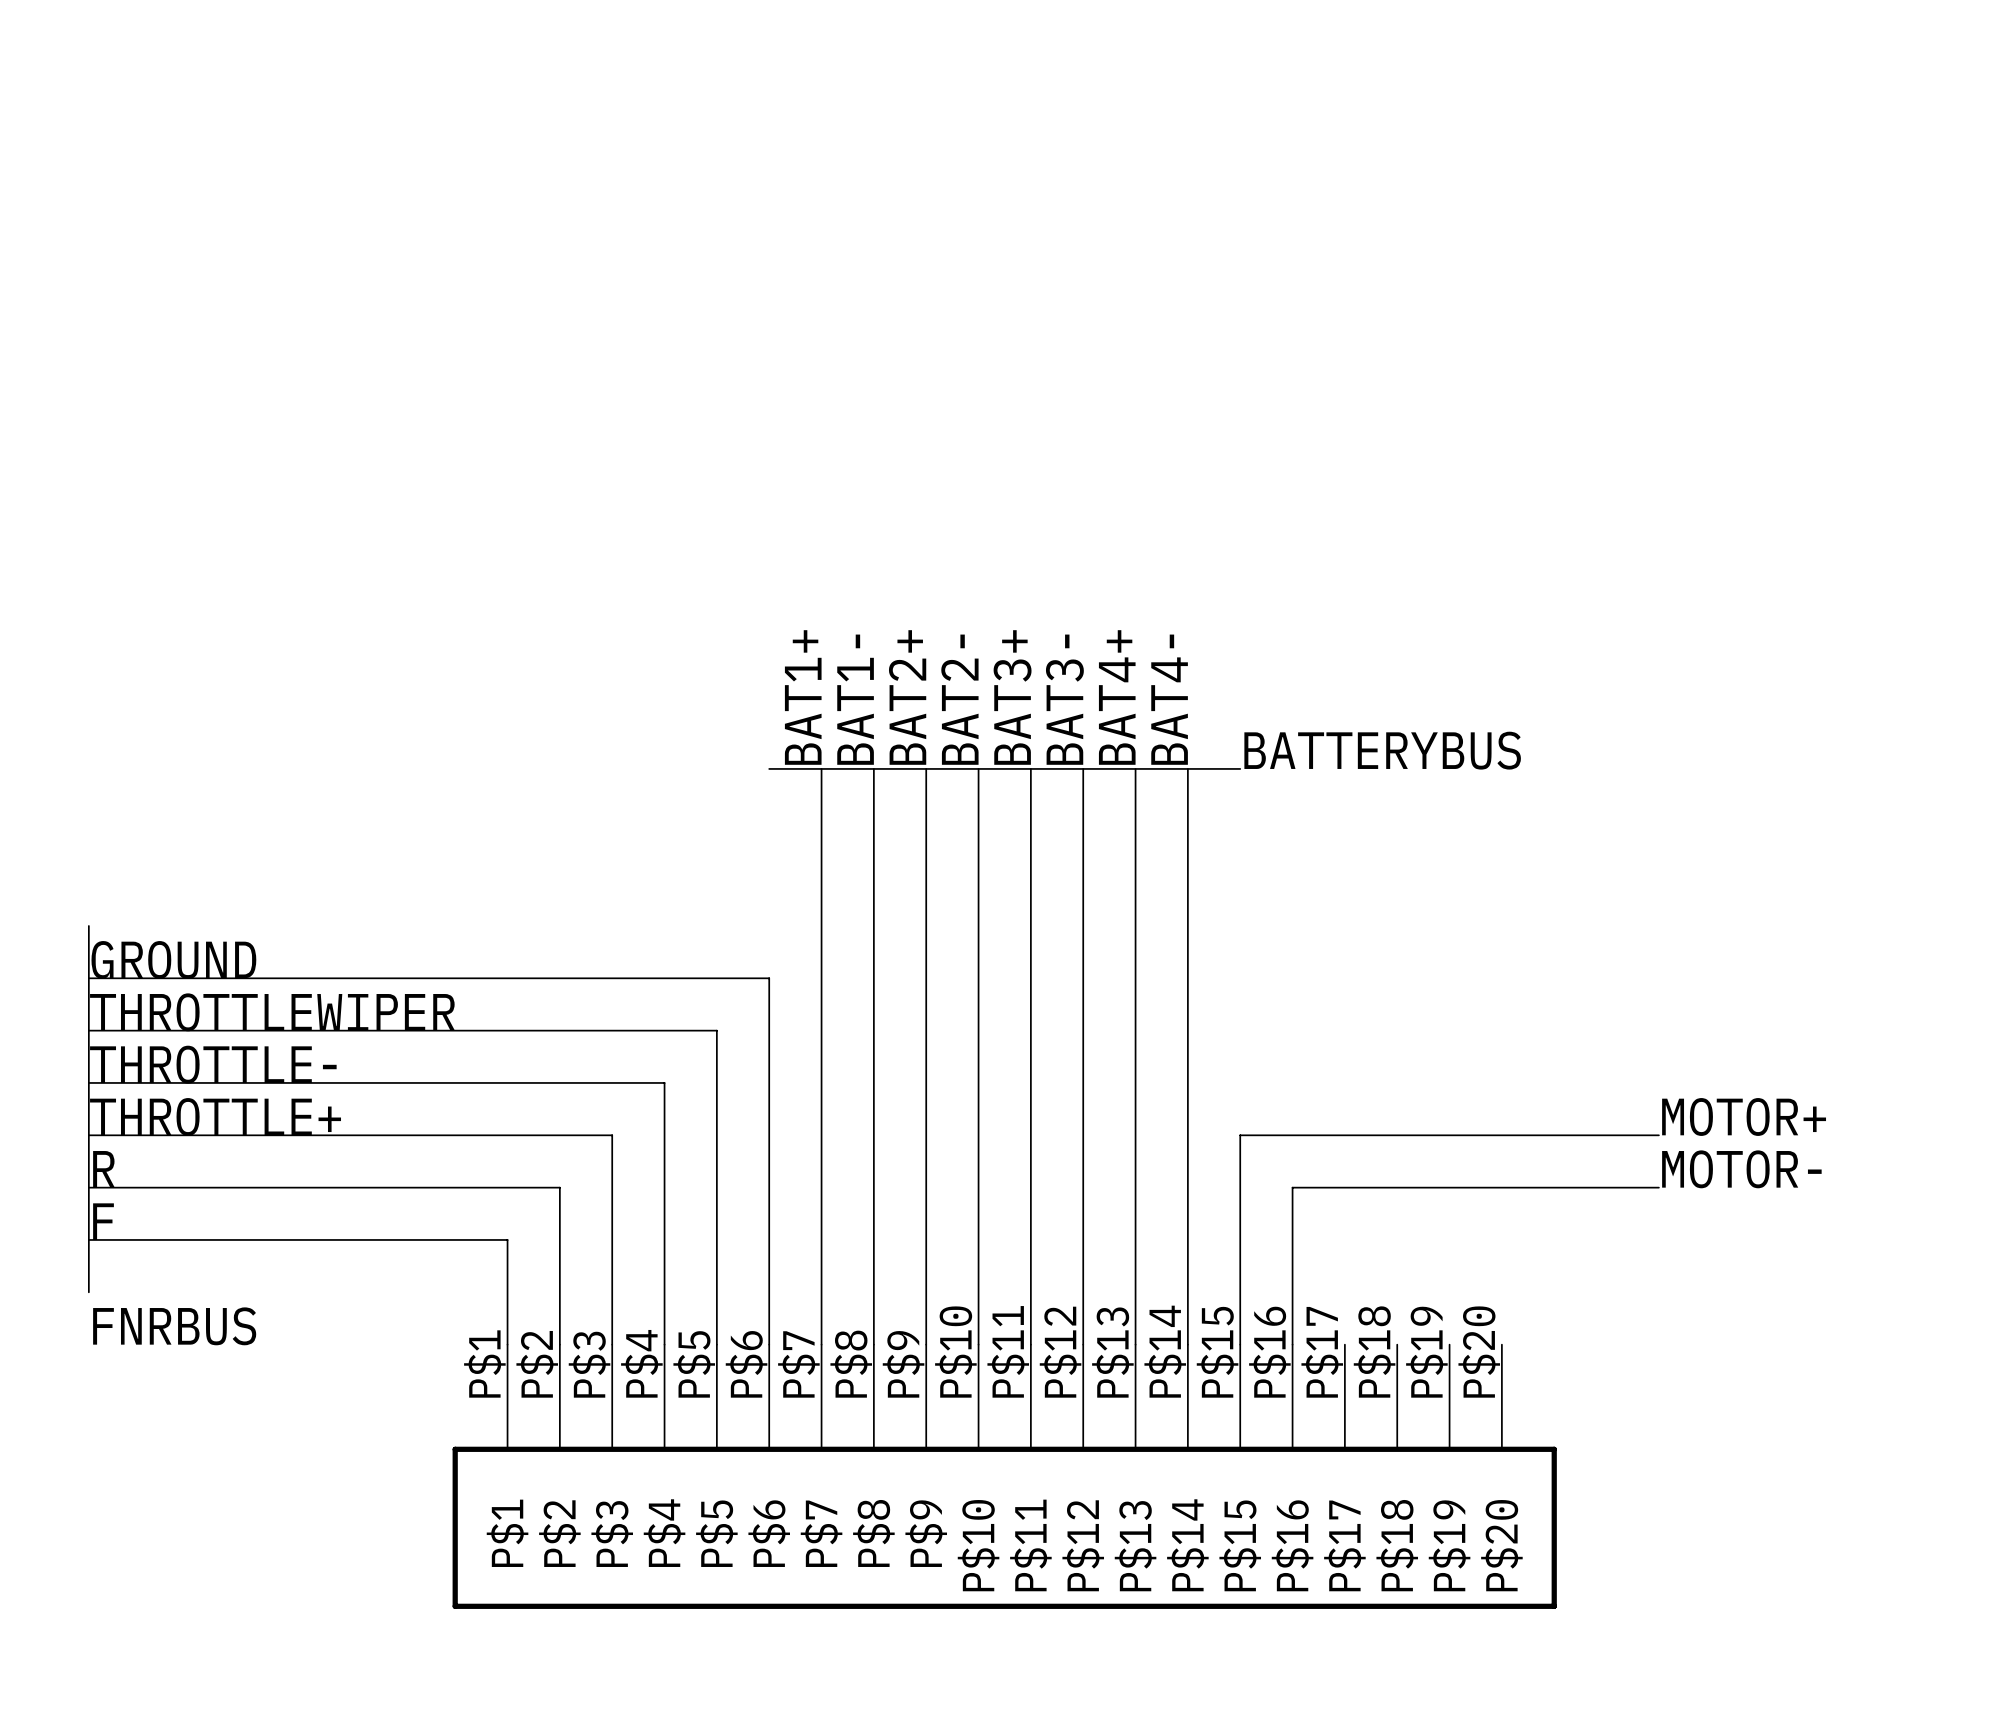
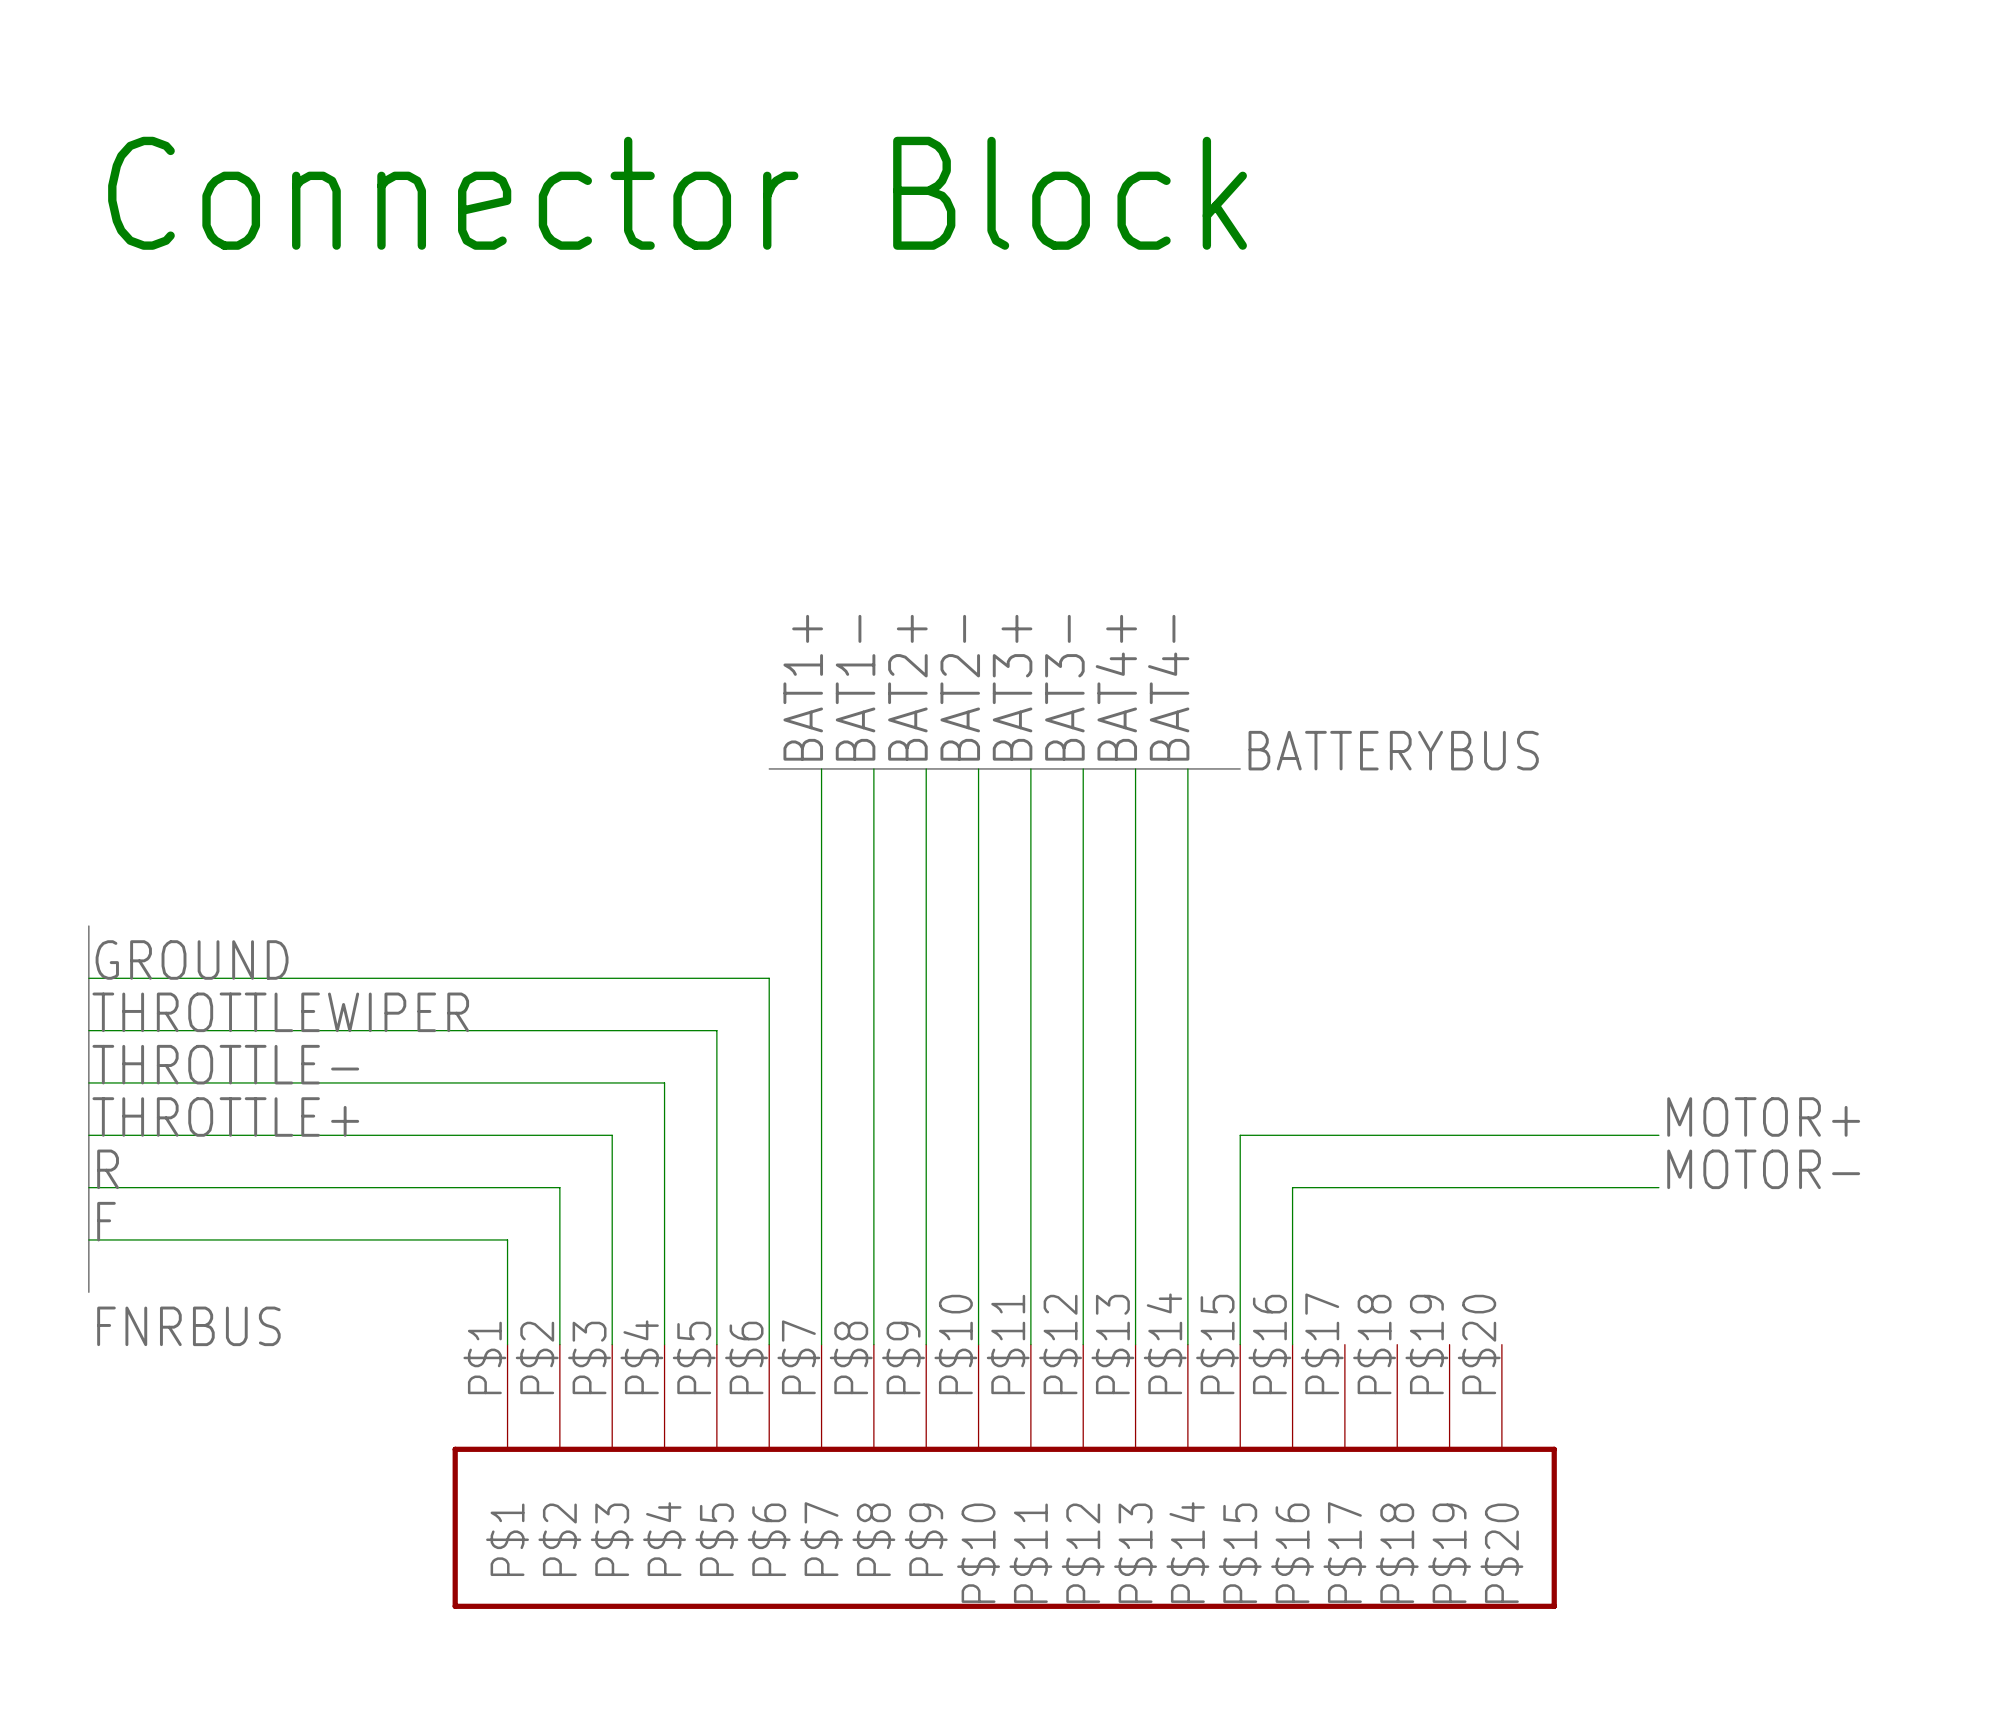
text: none -> Connector Block (677, 193)

